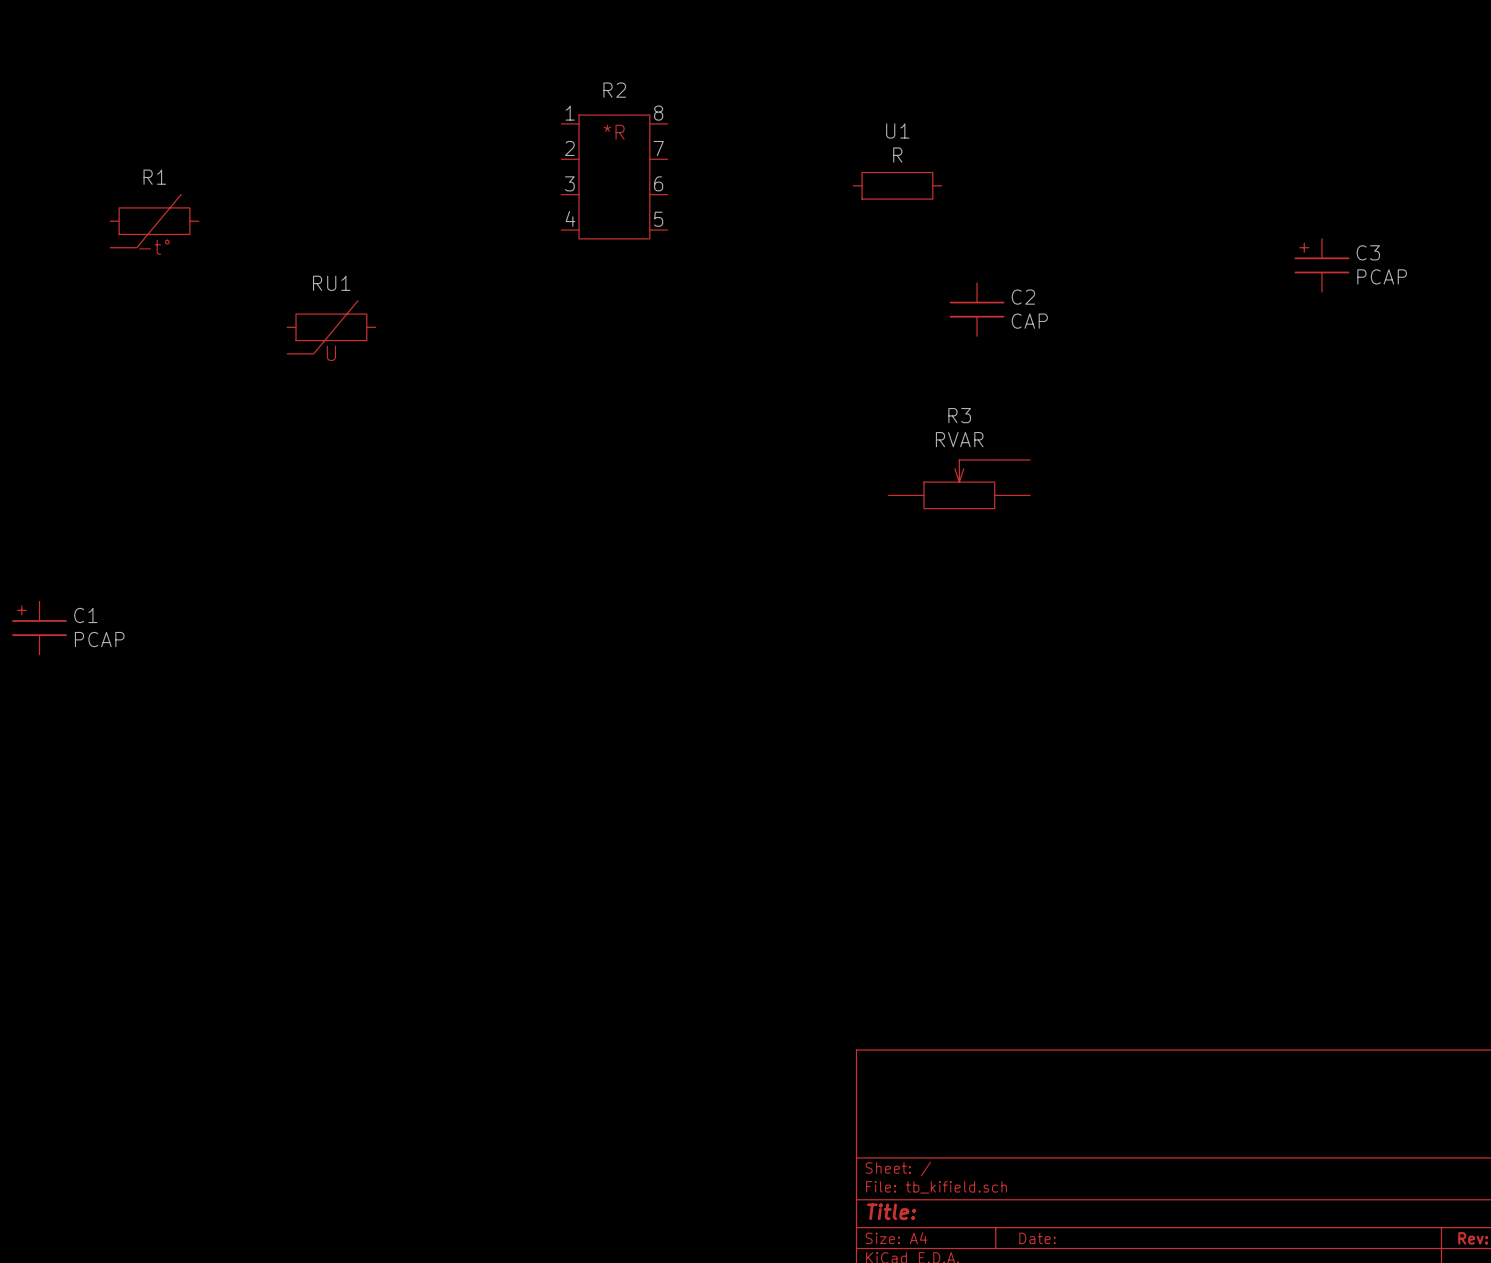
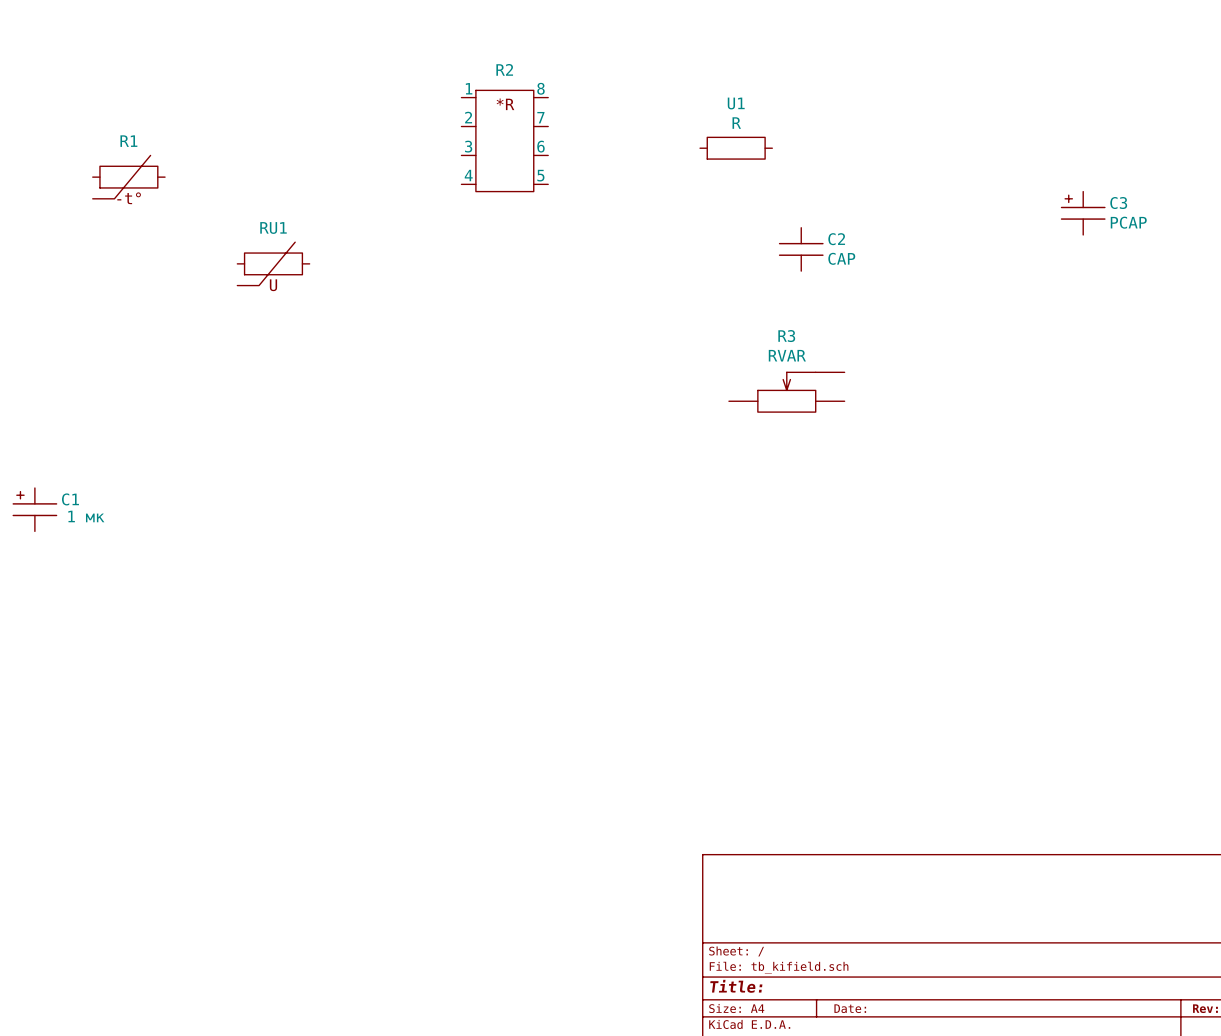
C1 text: none -> 1 мк (86, 516)
C1 value: PCAP (99, 639) -> none

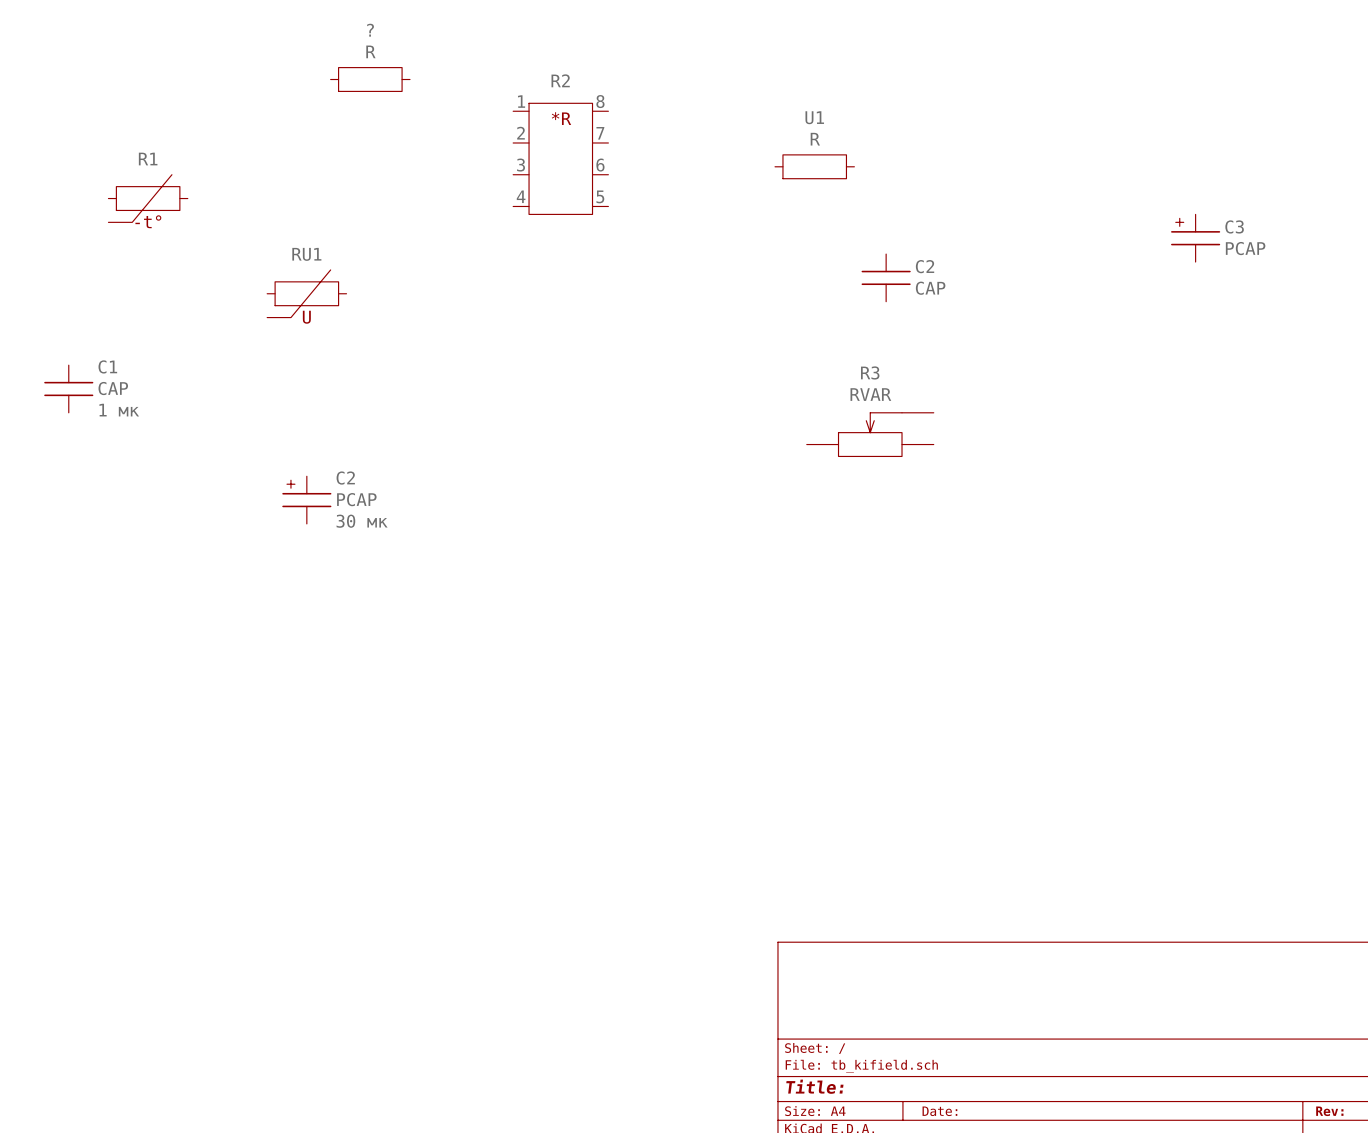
part: none -> R (370, 79)
C1 value: none -> CAP (113, 388)
C2: none -> PCAP (306, 500)
C1 symbol: [12, 488, 58, 532] -> [44, 365, 94, 413]
C1 text position: 1 мк (86, 516) -> 1 мк (119, 410)

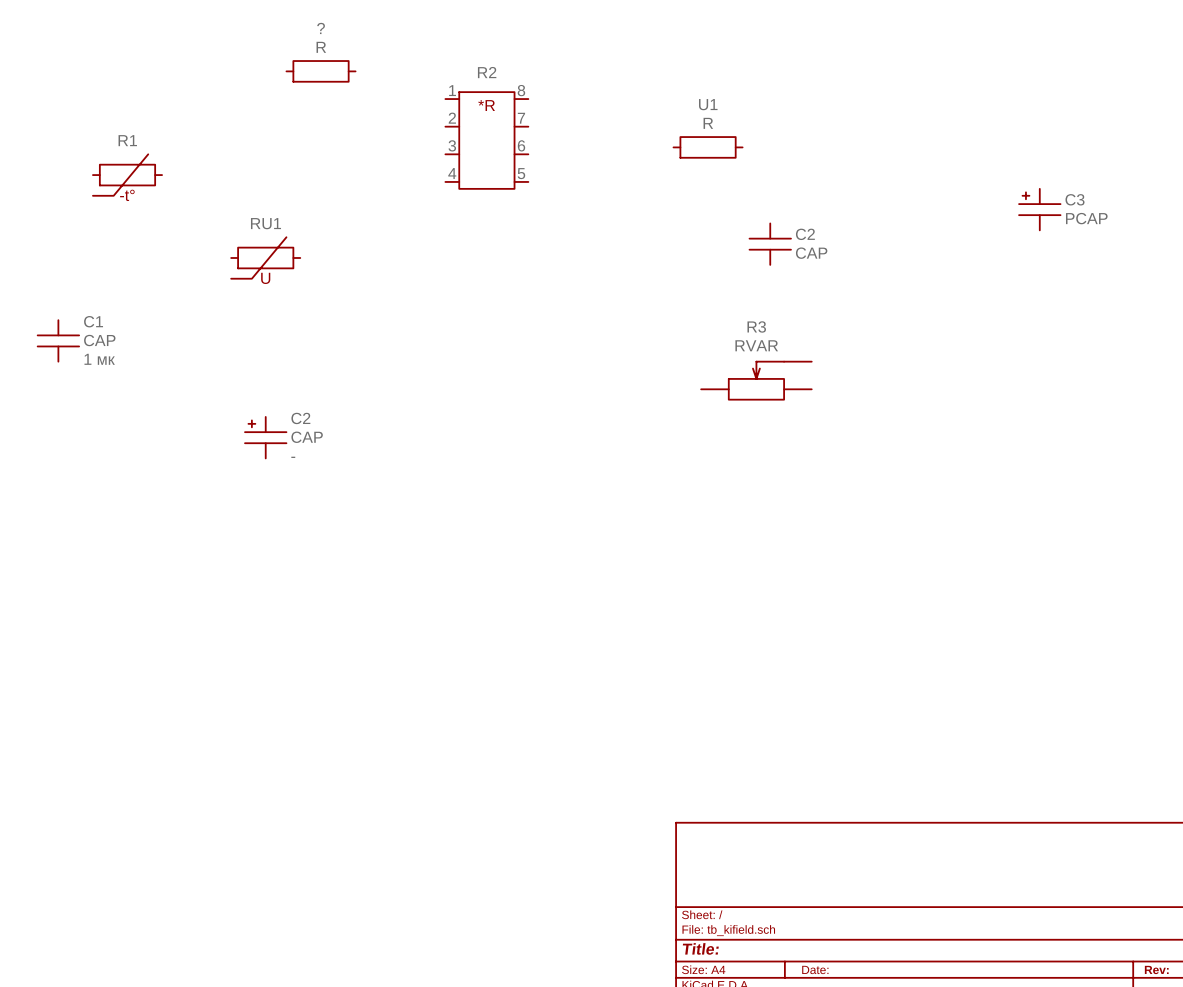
C2 value: PCAP (356, 499) -> CAP (307, 437)
C2 text: 30 мк (362, 521) -> - (293, 457)

